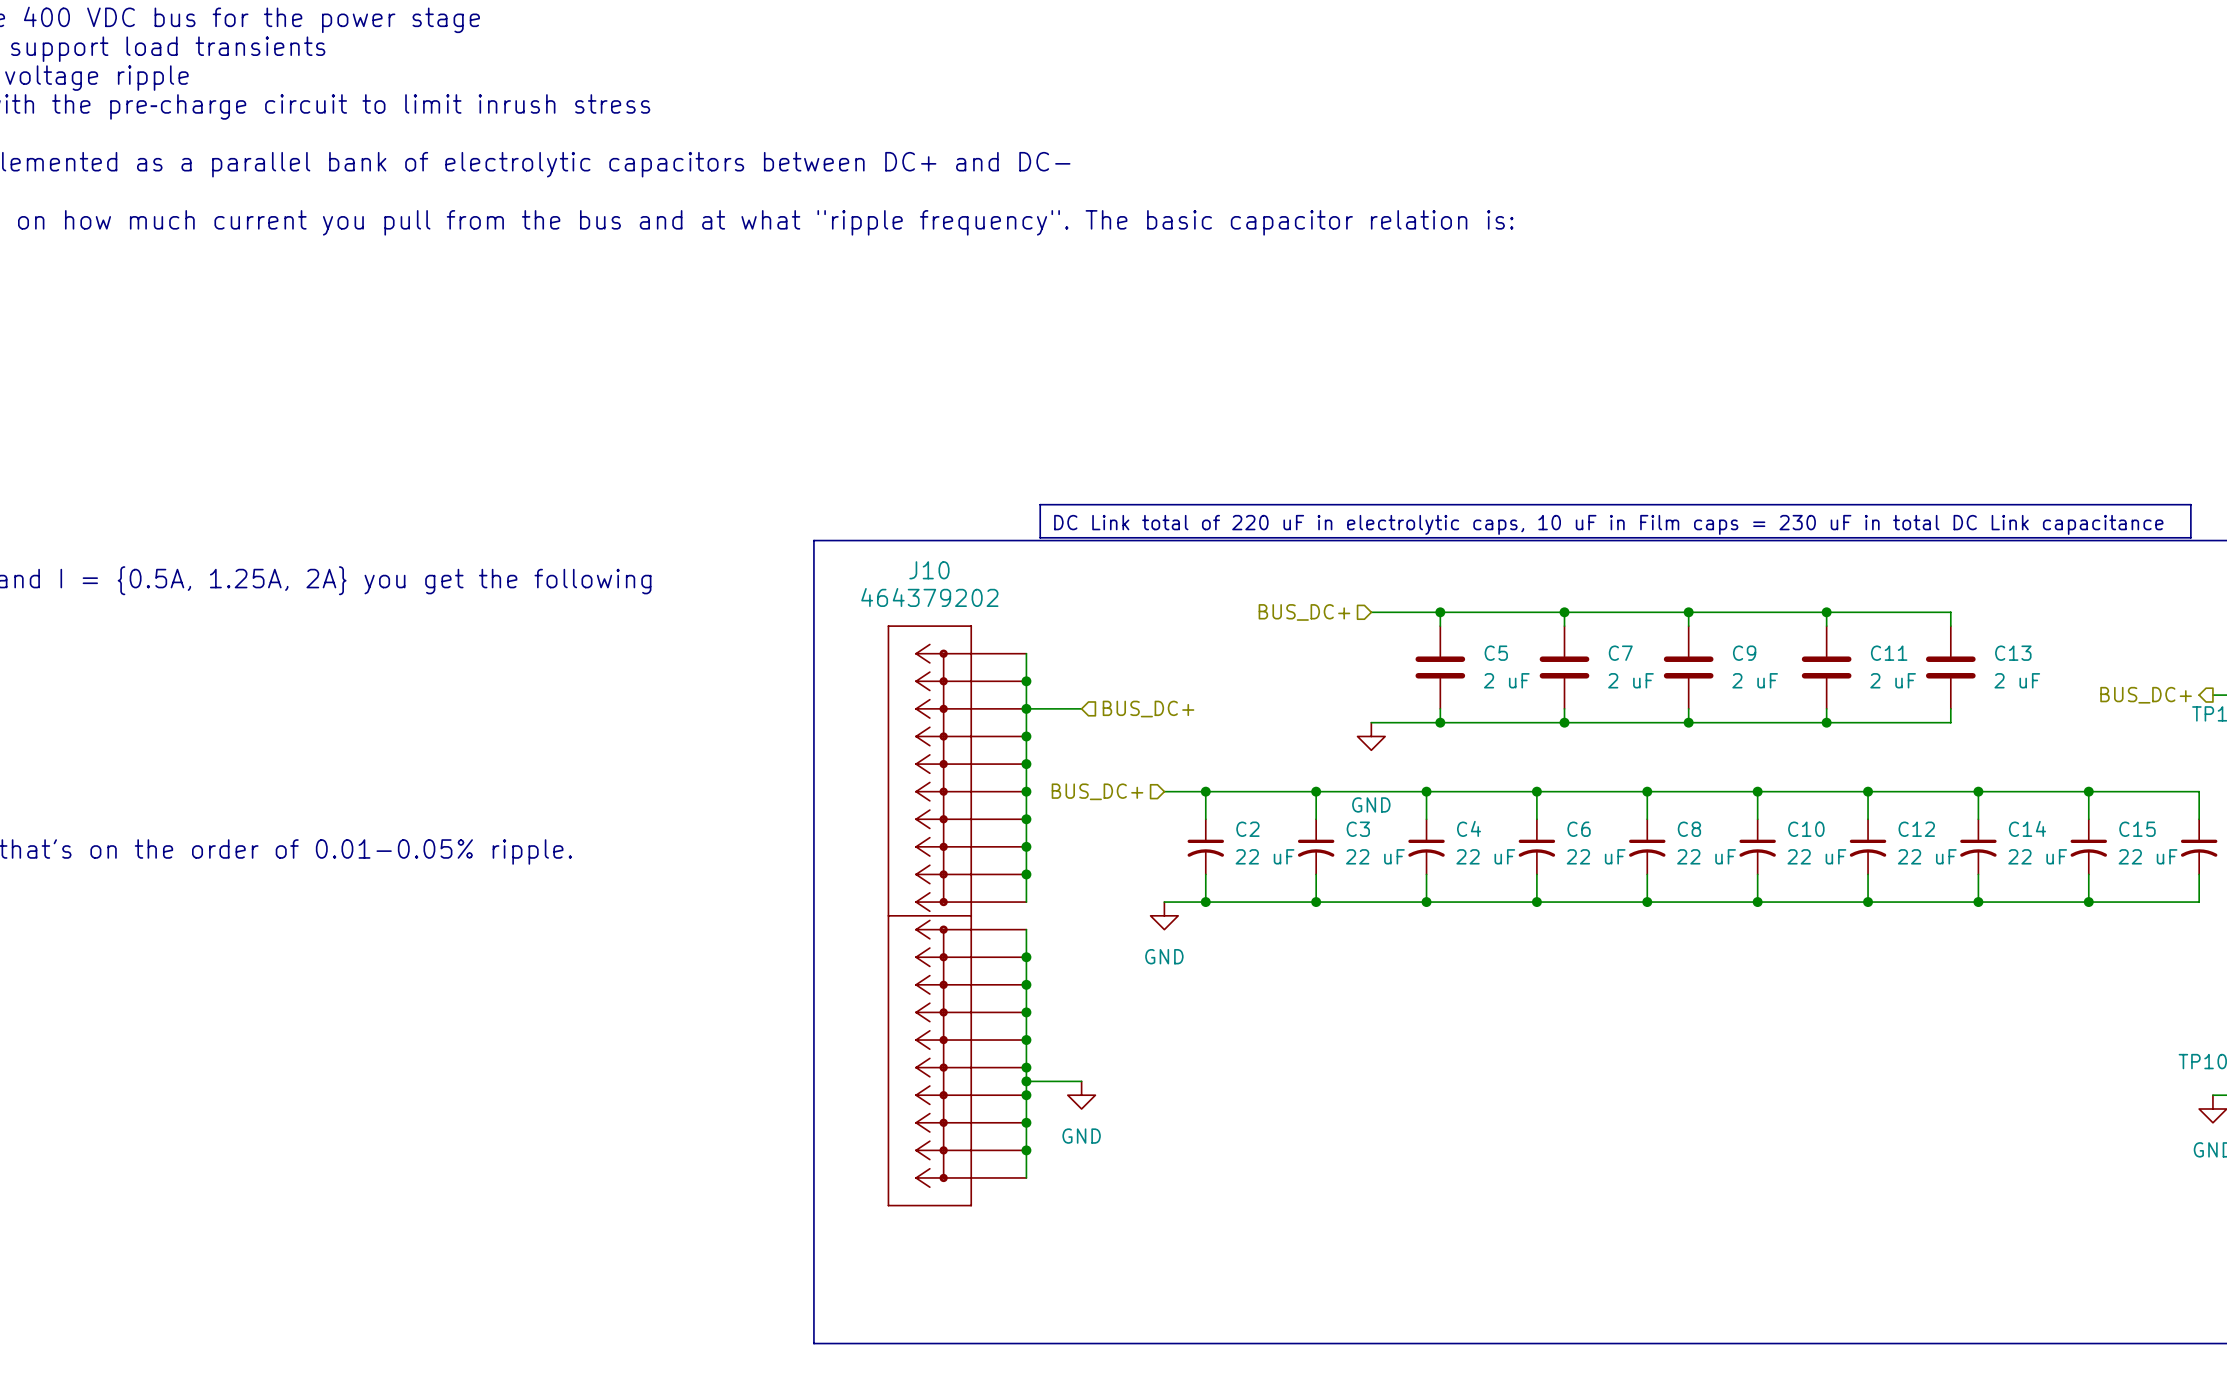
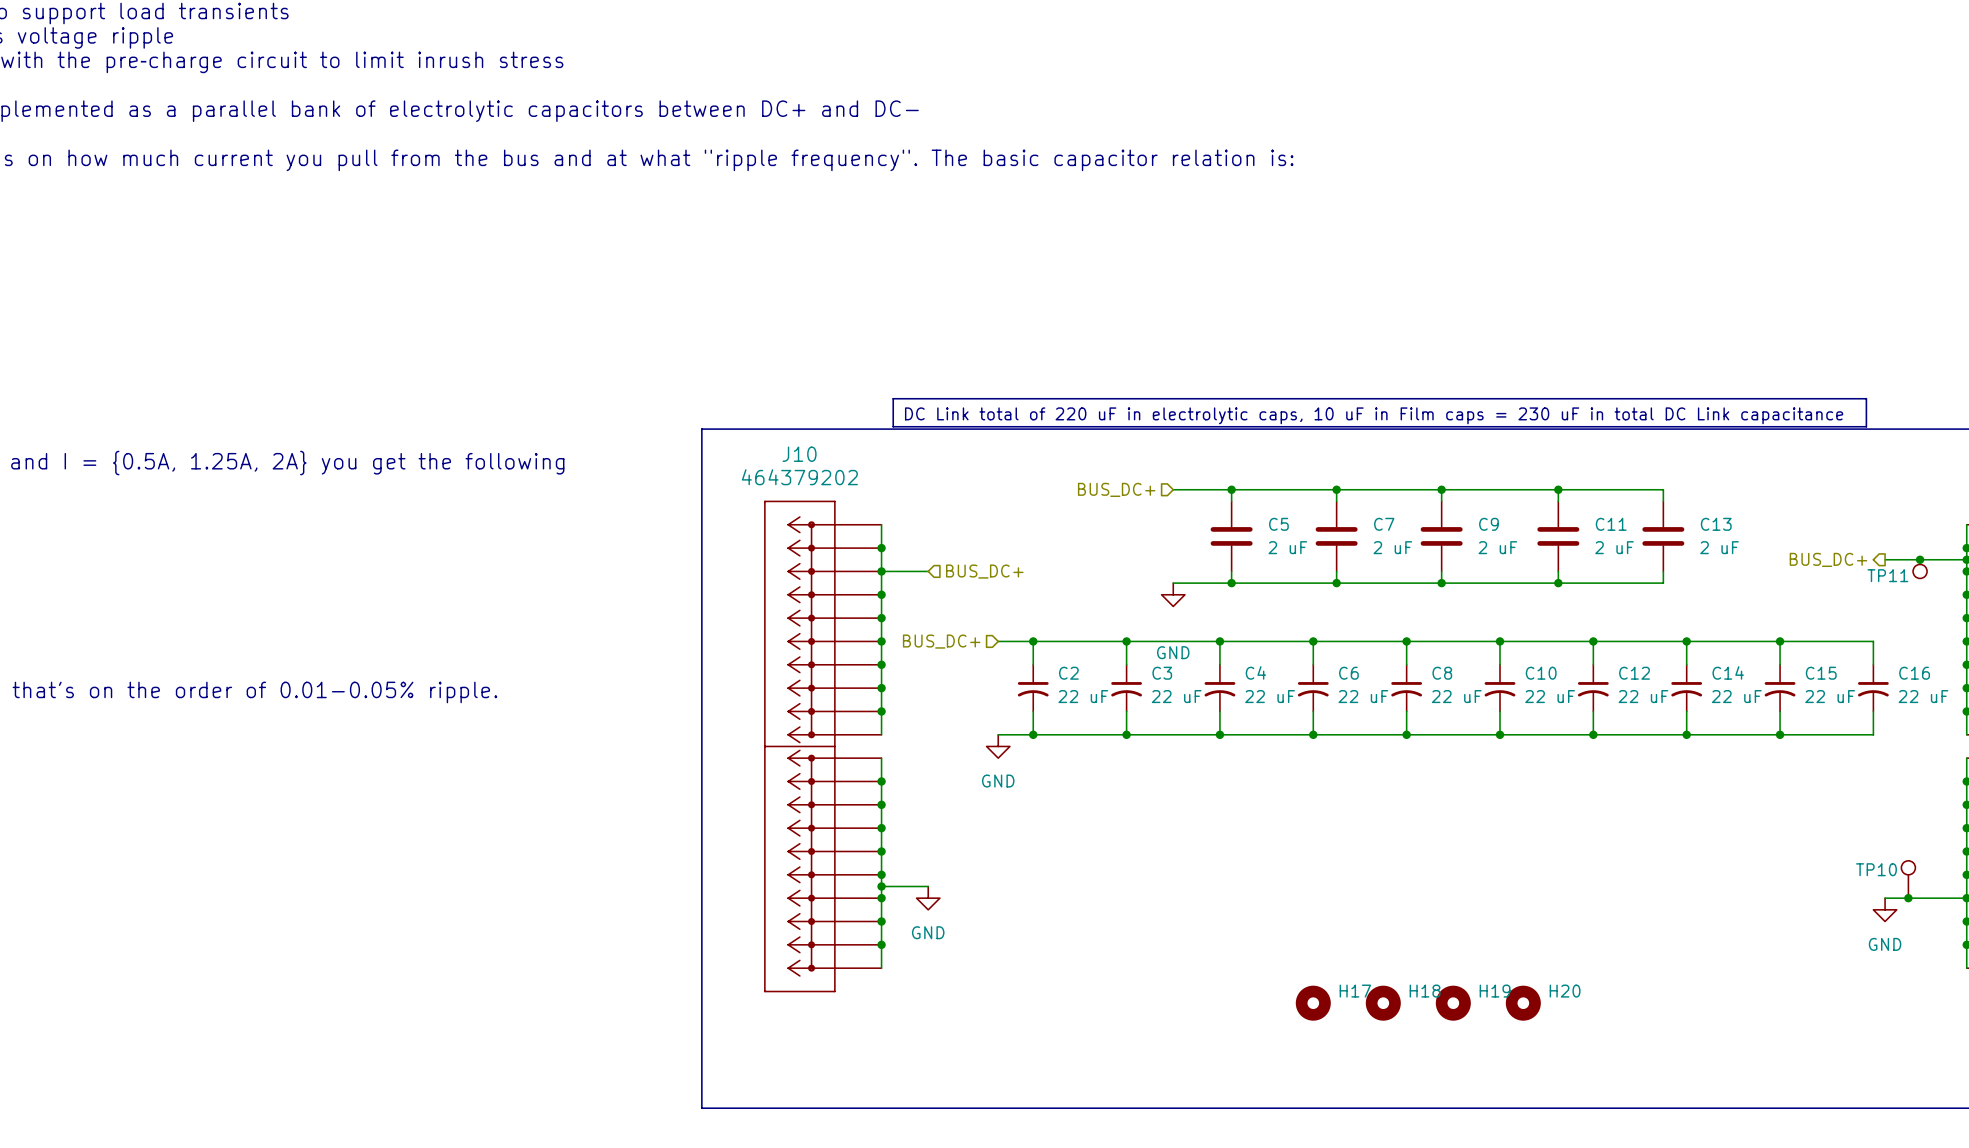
H17: none -> (1313, 1003)
H18: none -> (1383, 1003)
H19: none -> (1453, 1003)
H20: none -> (1523, 1003)

